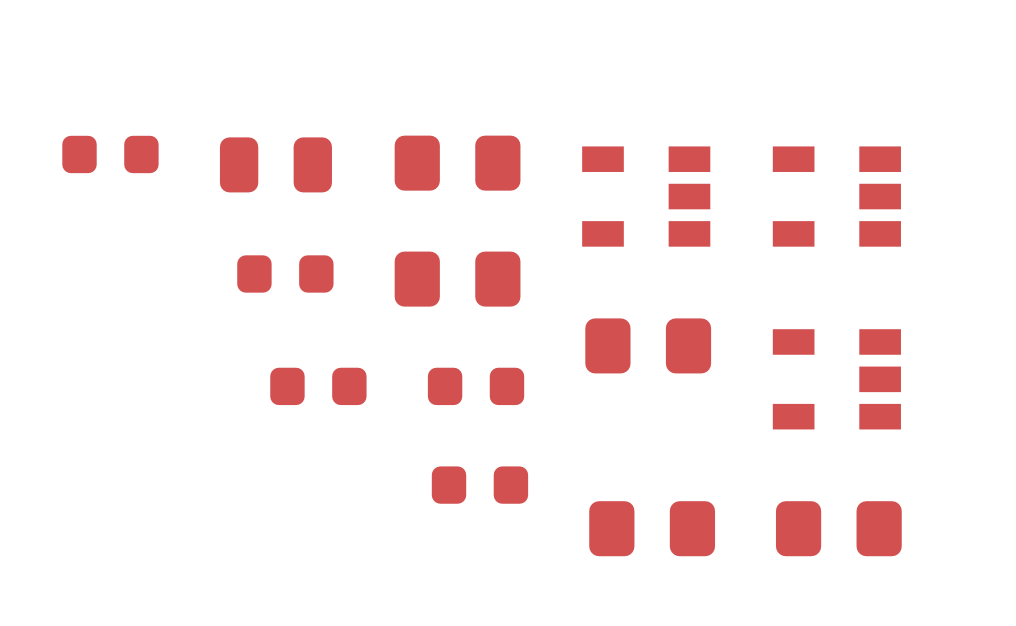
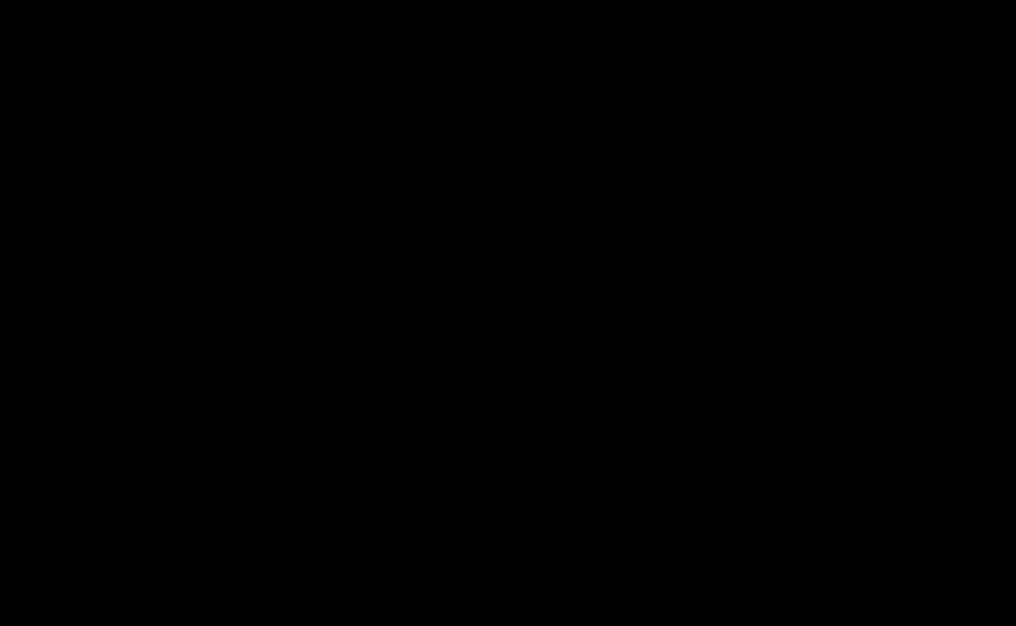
part: (110, 154) -> none
part: (457, 163) -> none
part: (275, 164) -> none
part: (646, 196) -> none
part: (836, 196) -> none
part: (285, 273) -> none
part: (457, 279) -> none
part: (648, 345) -> none
part: (836, 379) -> none
part: (318, 386) -> none
part: (476, 386) -> none
part: (479, 485) -> none
part: (652, 528) -> none
part: (838, 528) -> none

